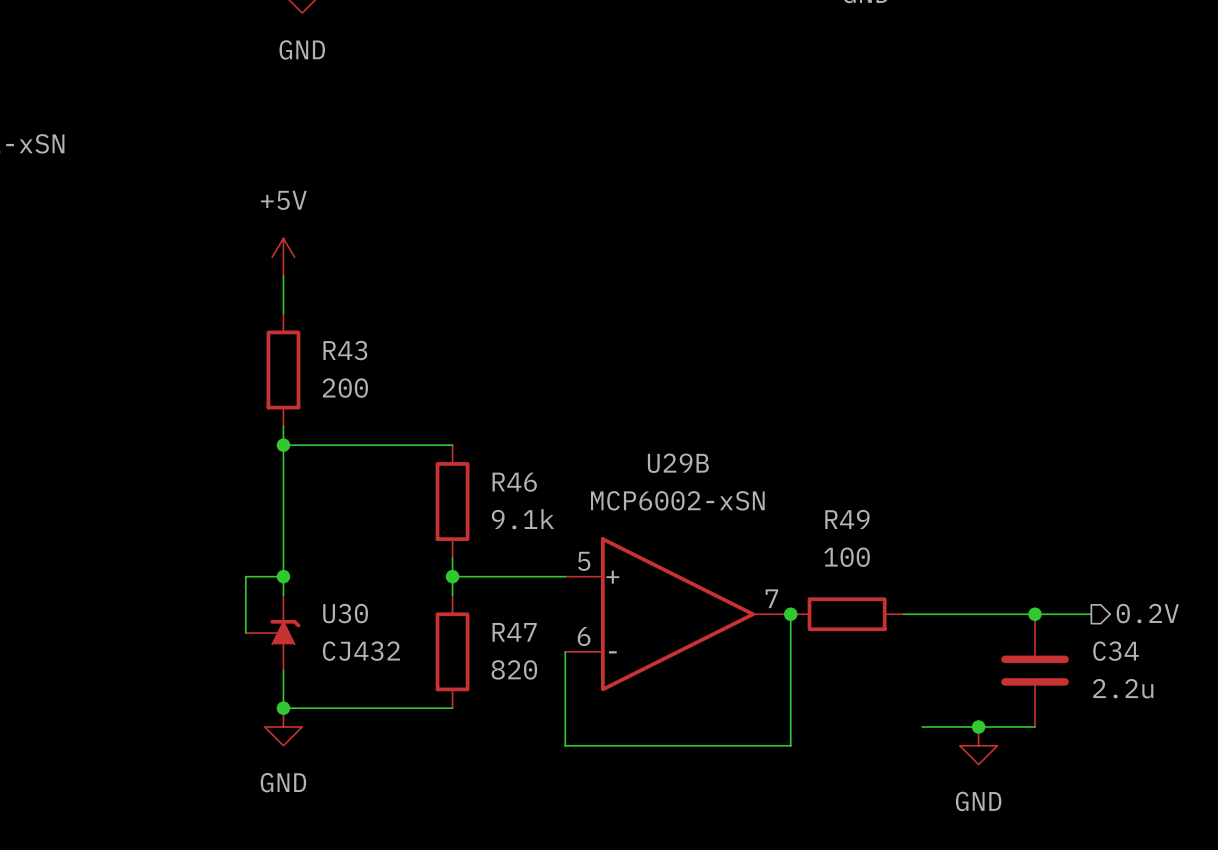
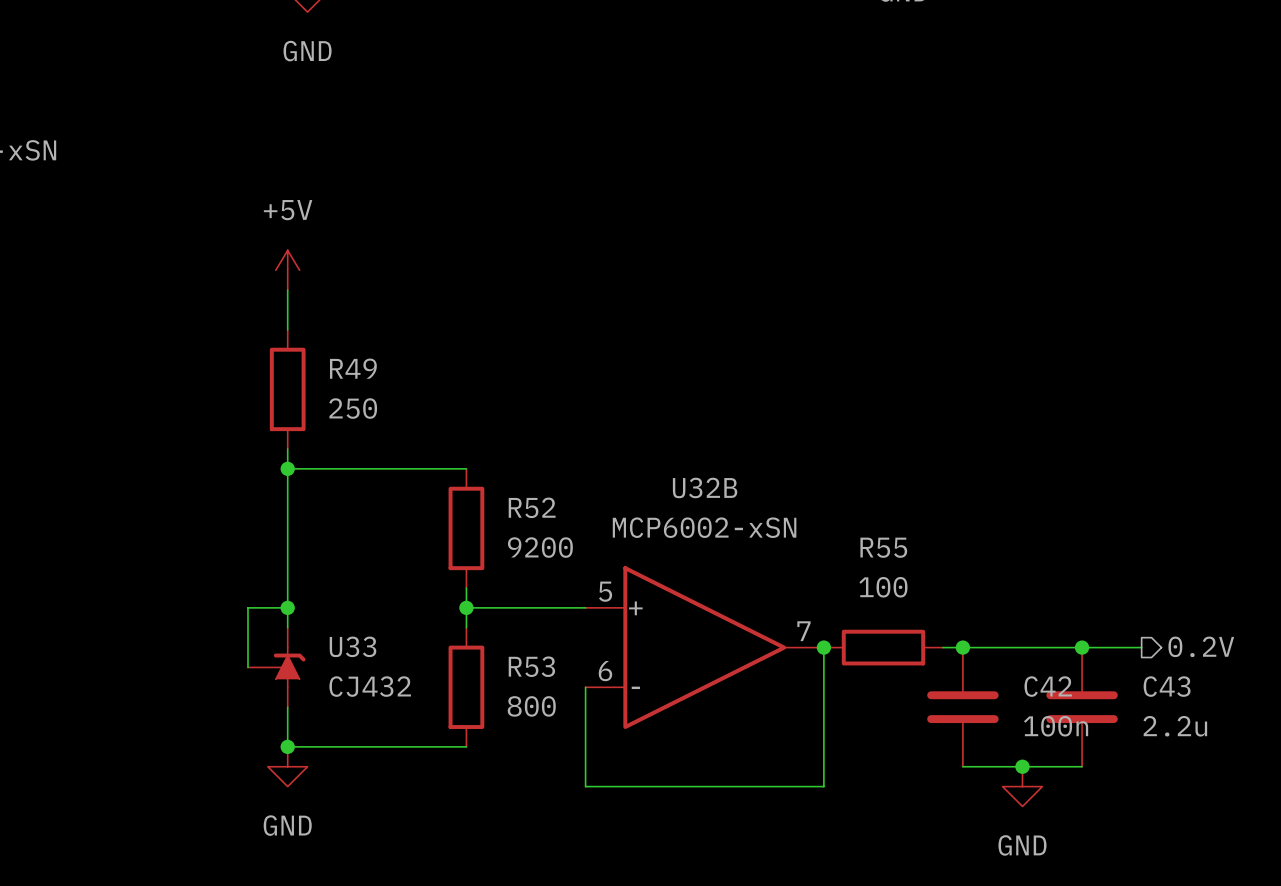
R43 name: R43 (345, 350) -> R49 (353, 368)
R43 value: 200 (345, 388) -> 250 (353, 408)
U29B name: U29B (678, 463) -> U32B (705, 487)
R46 name: R46 (514, 482) -> R52 (532, 507)
R46 value: 9.1k (522, 519) -> 9200 (540, 547)
R49 name: R49 (847, 519) -> R55 (883, 547)
U30 name: U30 (345, 613) -> U33 (353, 646)
junction: none -> (962, 647)
R47 name: R47 (514, 632) -> R53 (531, 666)
C34 name: C34 (1116, 651) -> C43 (1167, 686)
R47 value: 820 (514, 669) -> 800 (531, 706)
C42: none -> 100n (962, 707)

